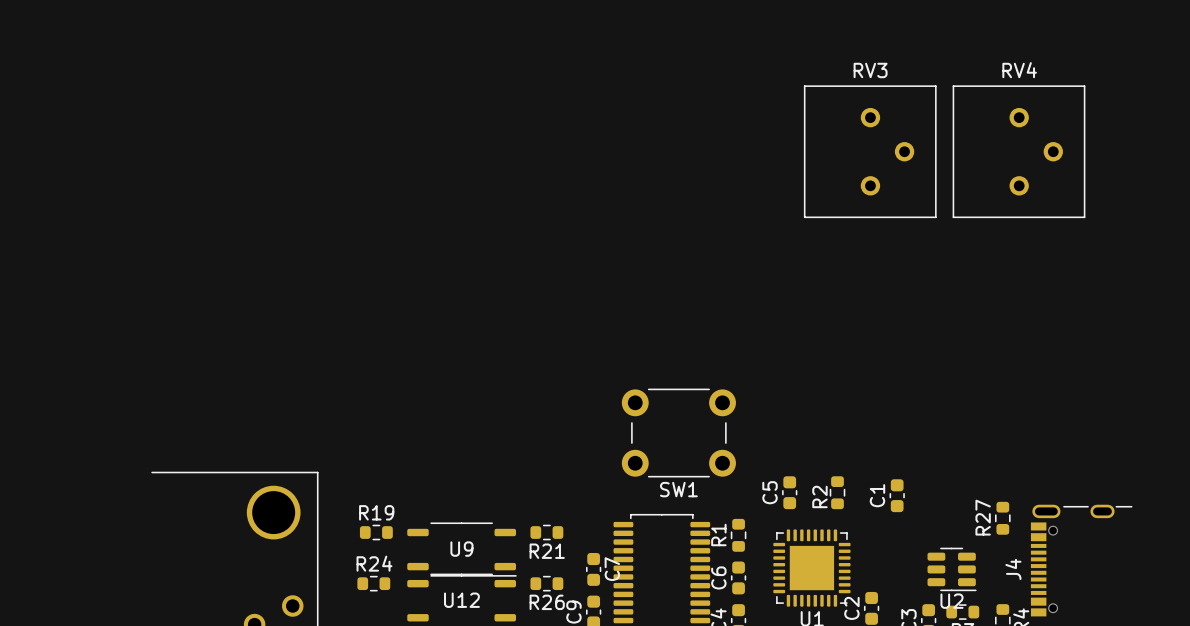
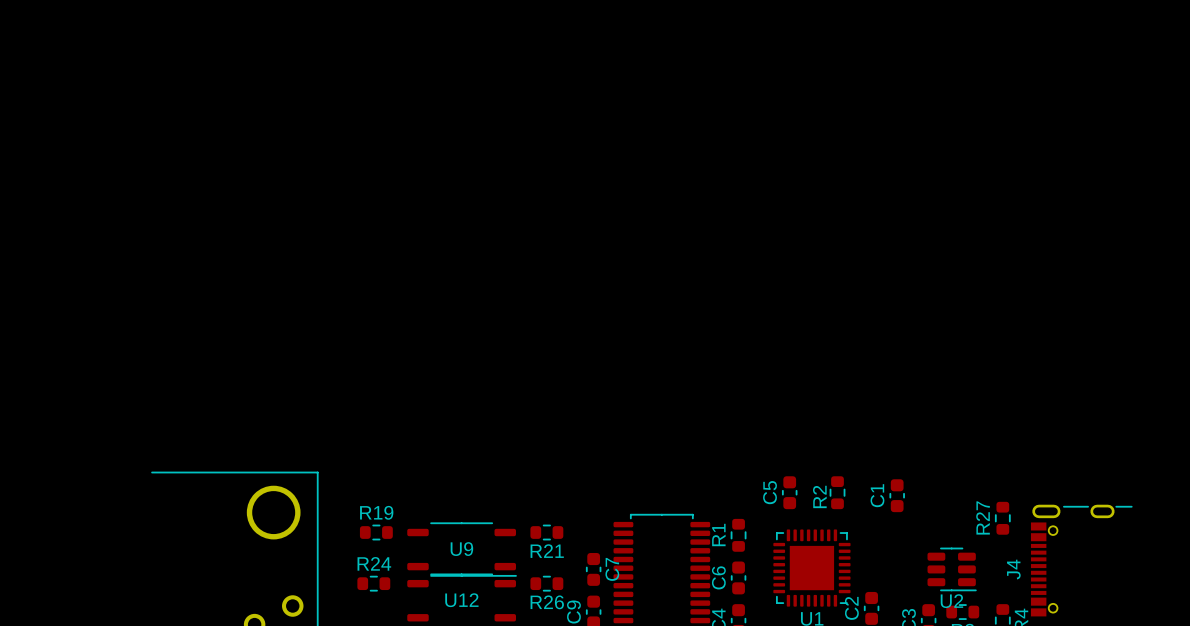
RV3: (870, 151) -> none
RV4: (1019, 151) -> none
SW1: (678, 433) -> none

